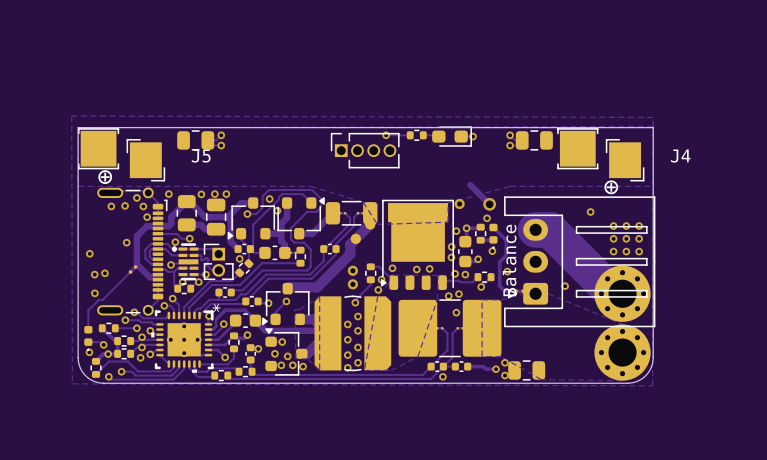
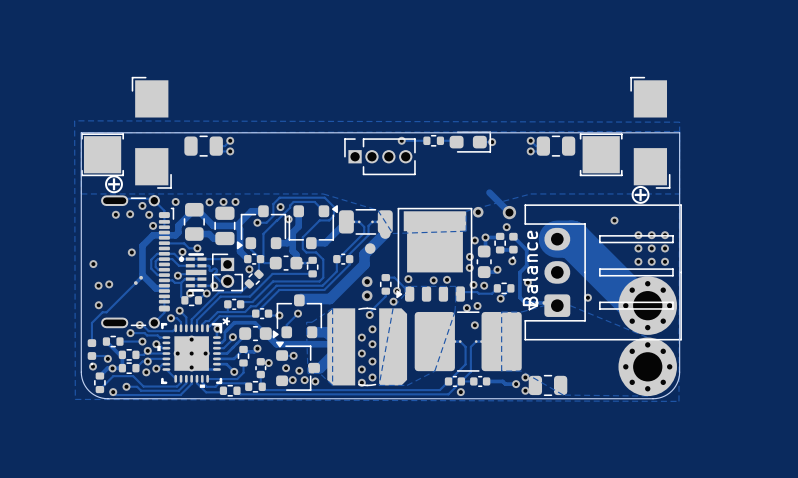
part: none -> (151, 132)
part: none -> (650, 132)
J5: (145, 160) -> none
J4: (625, 160) -> none

